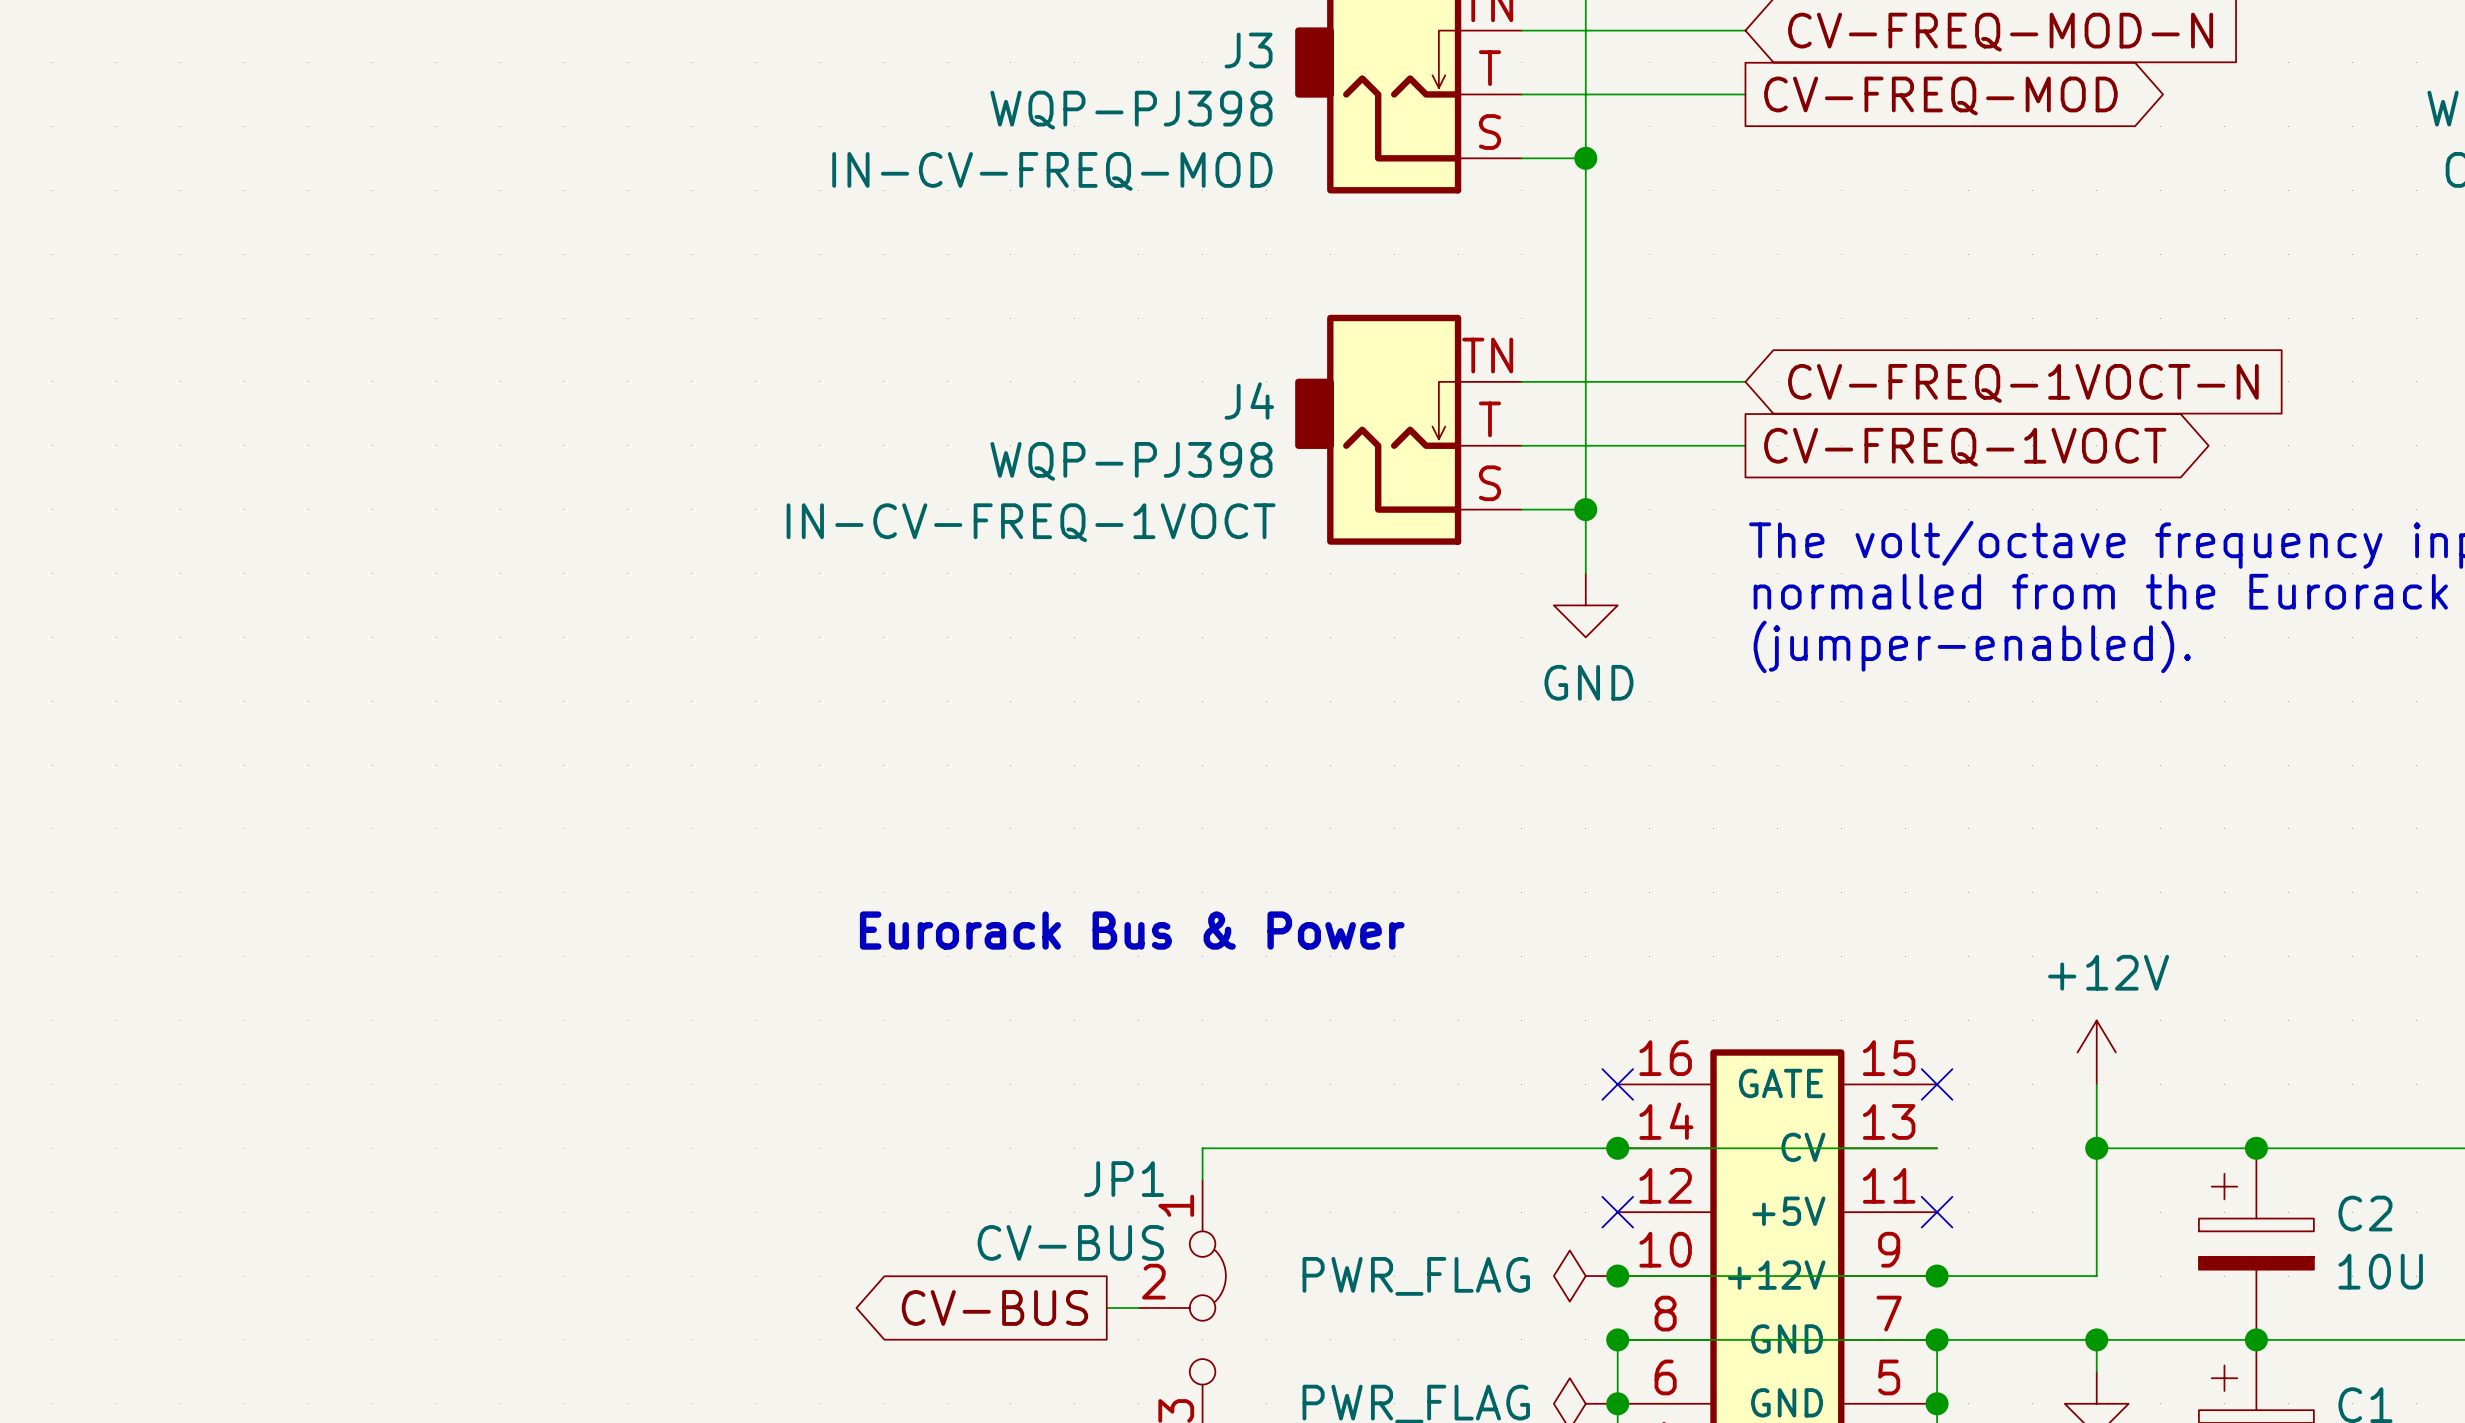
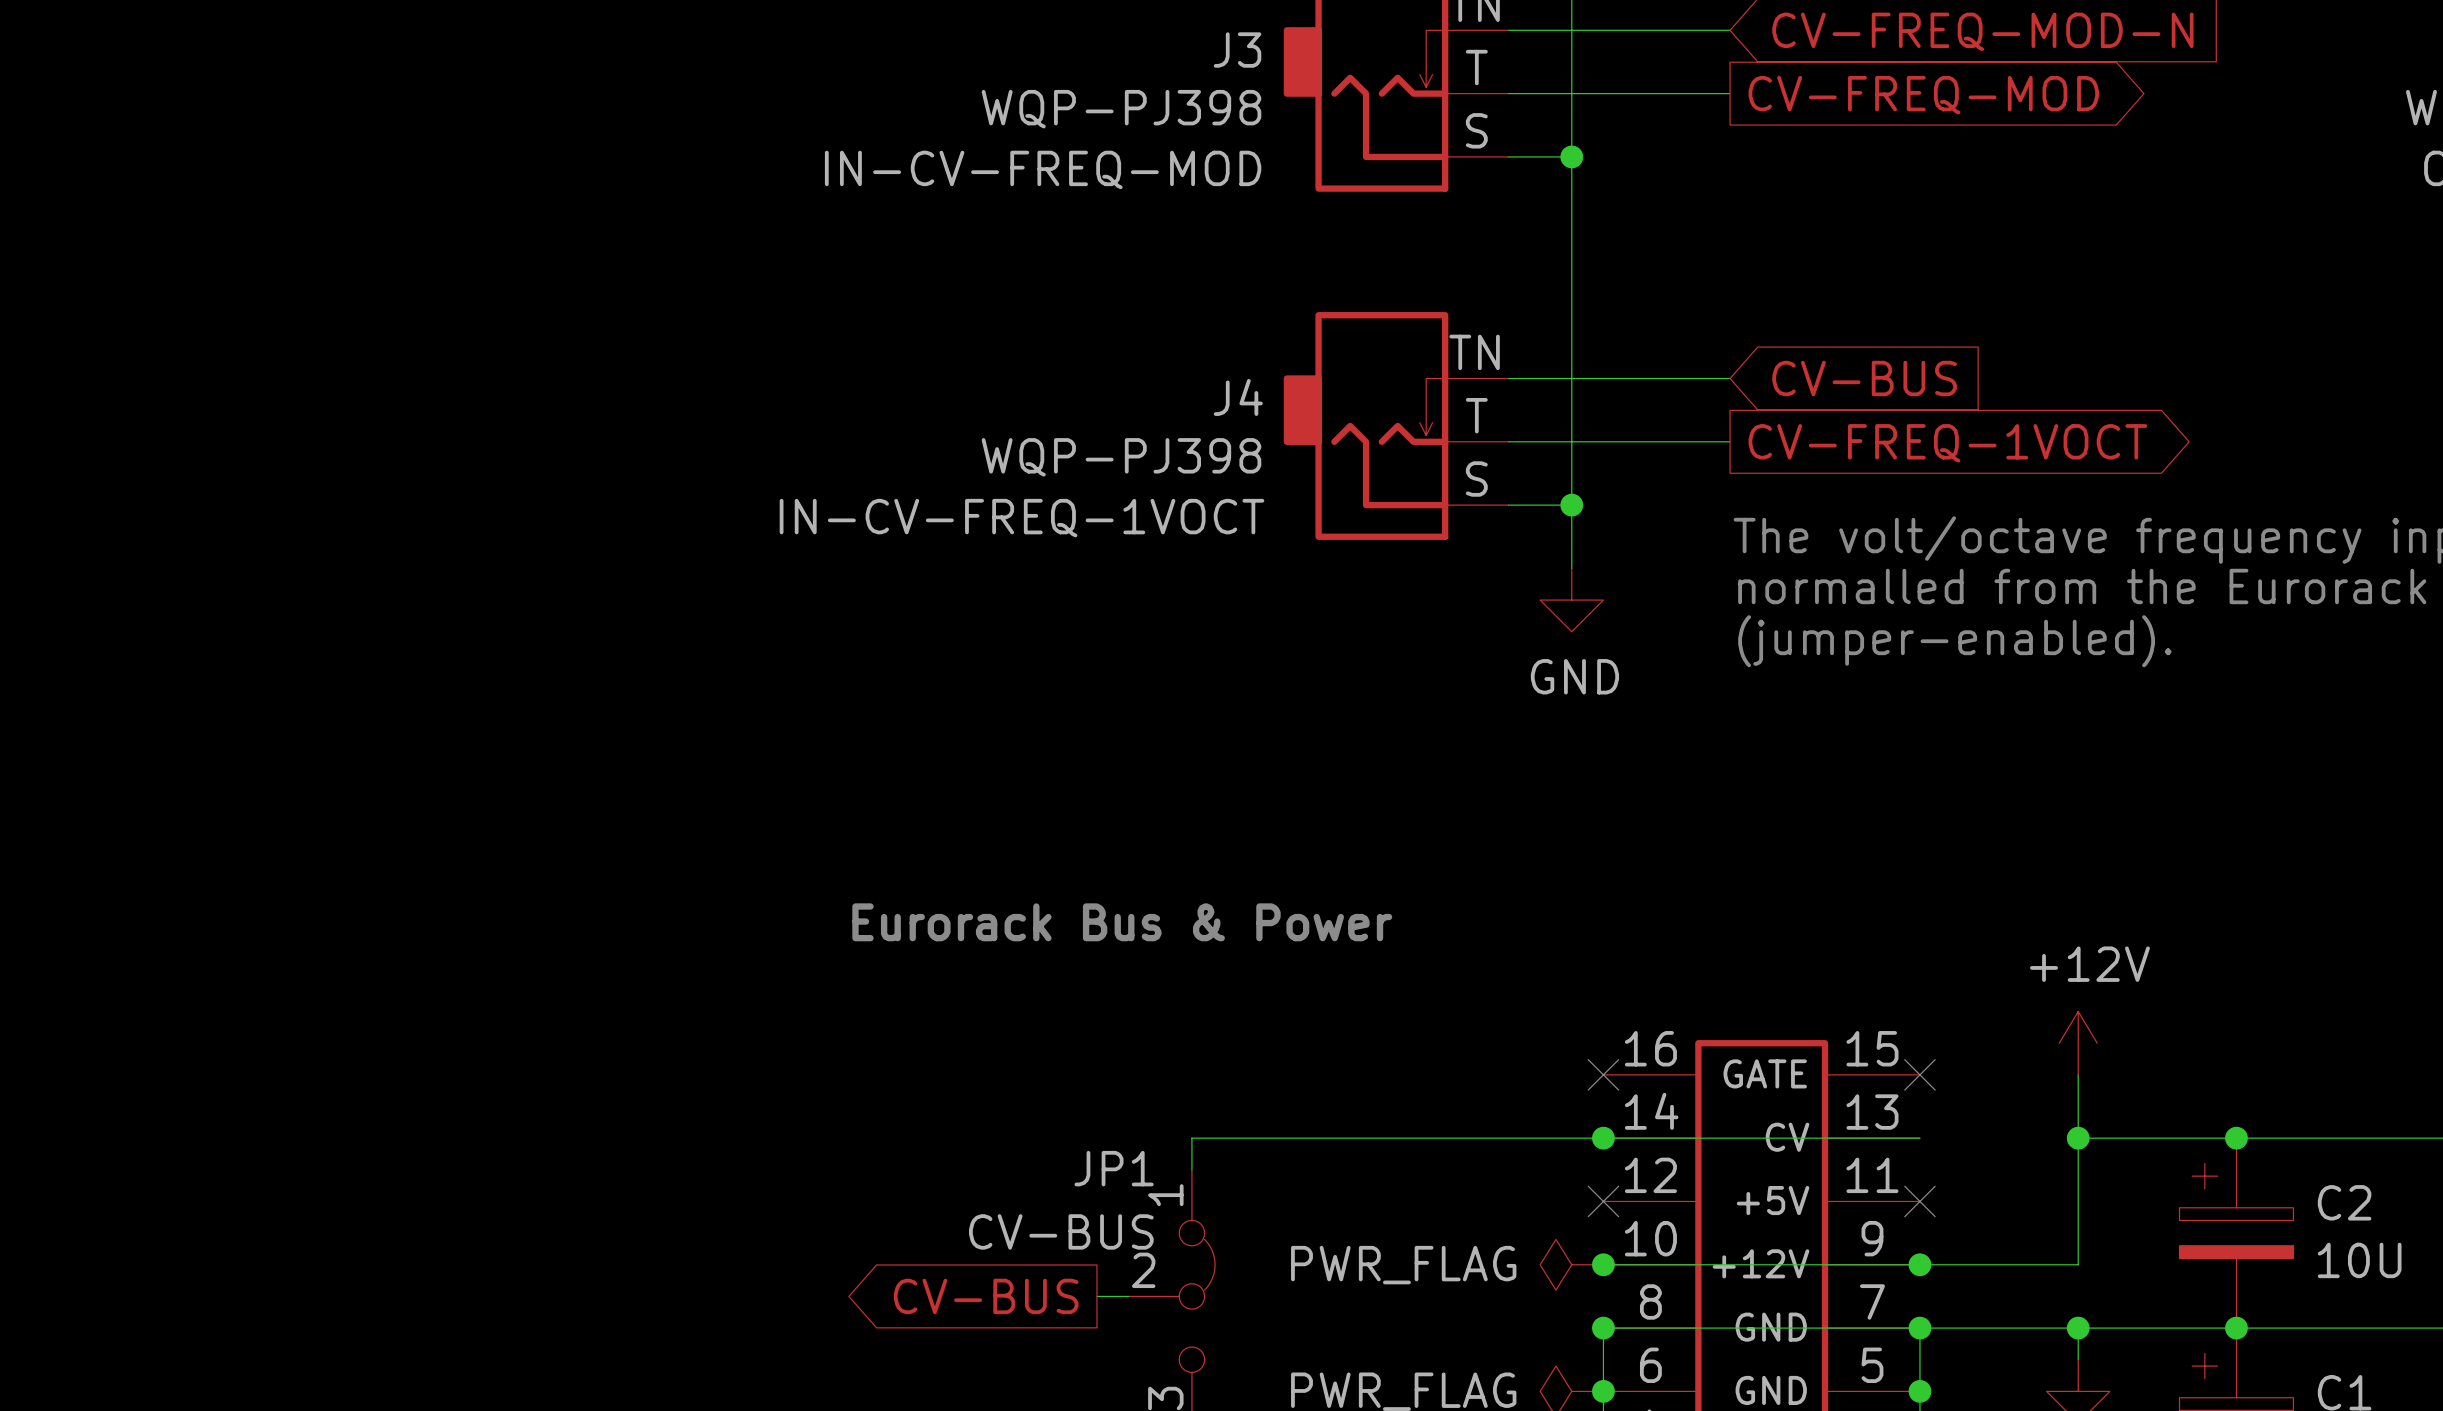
global label: CV-FREQ-1VOCT-N (2023, 383) -> CV-BUS (1864, 378)

